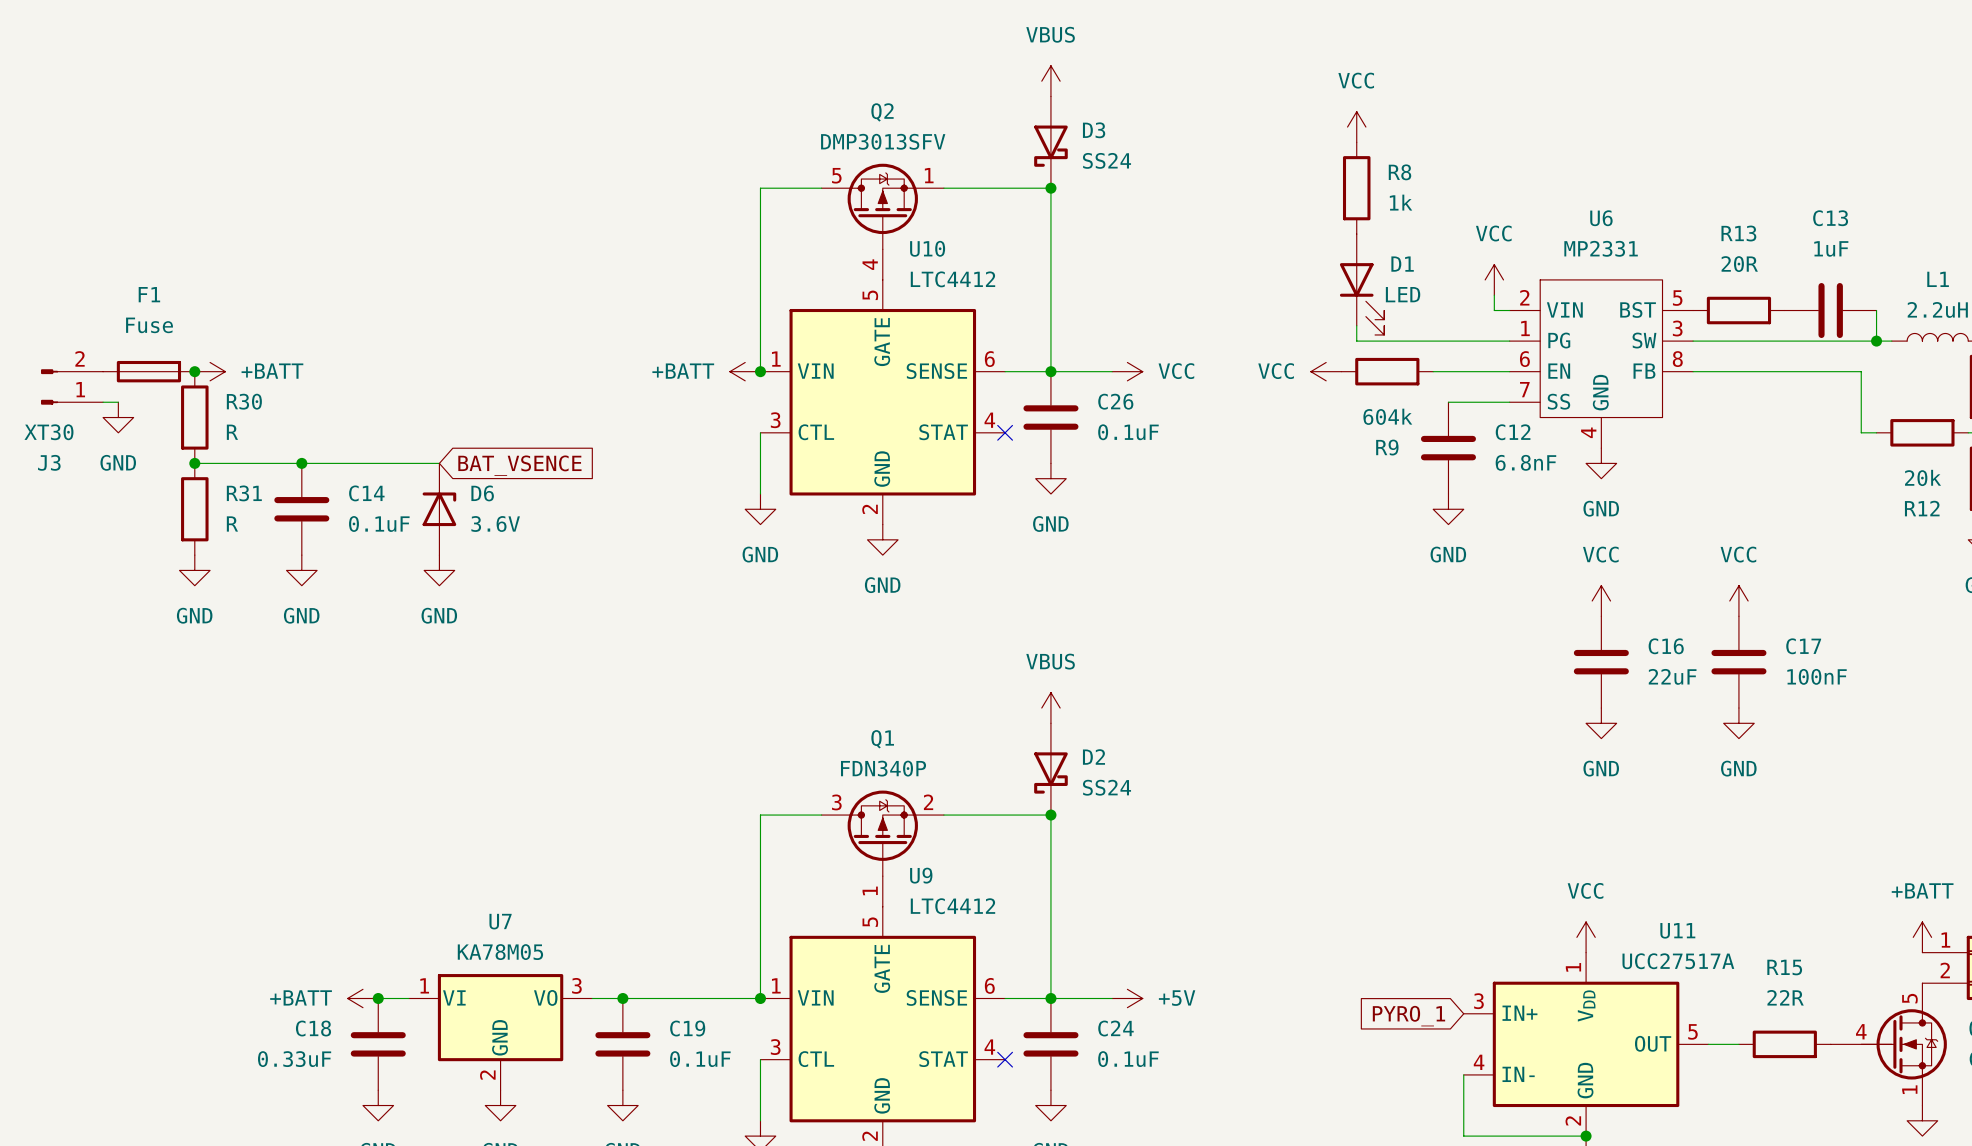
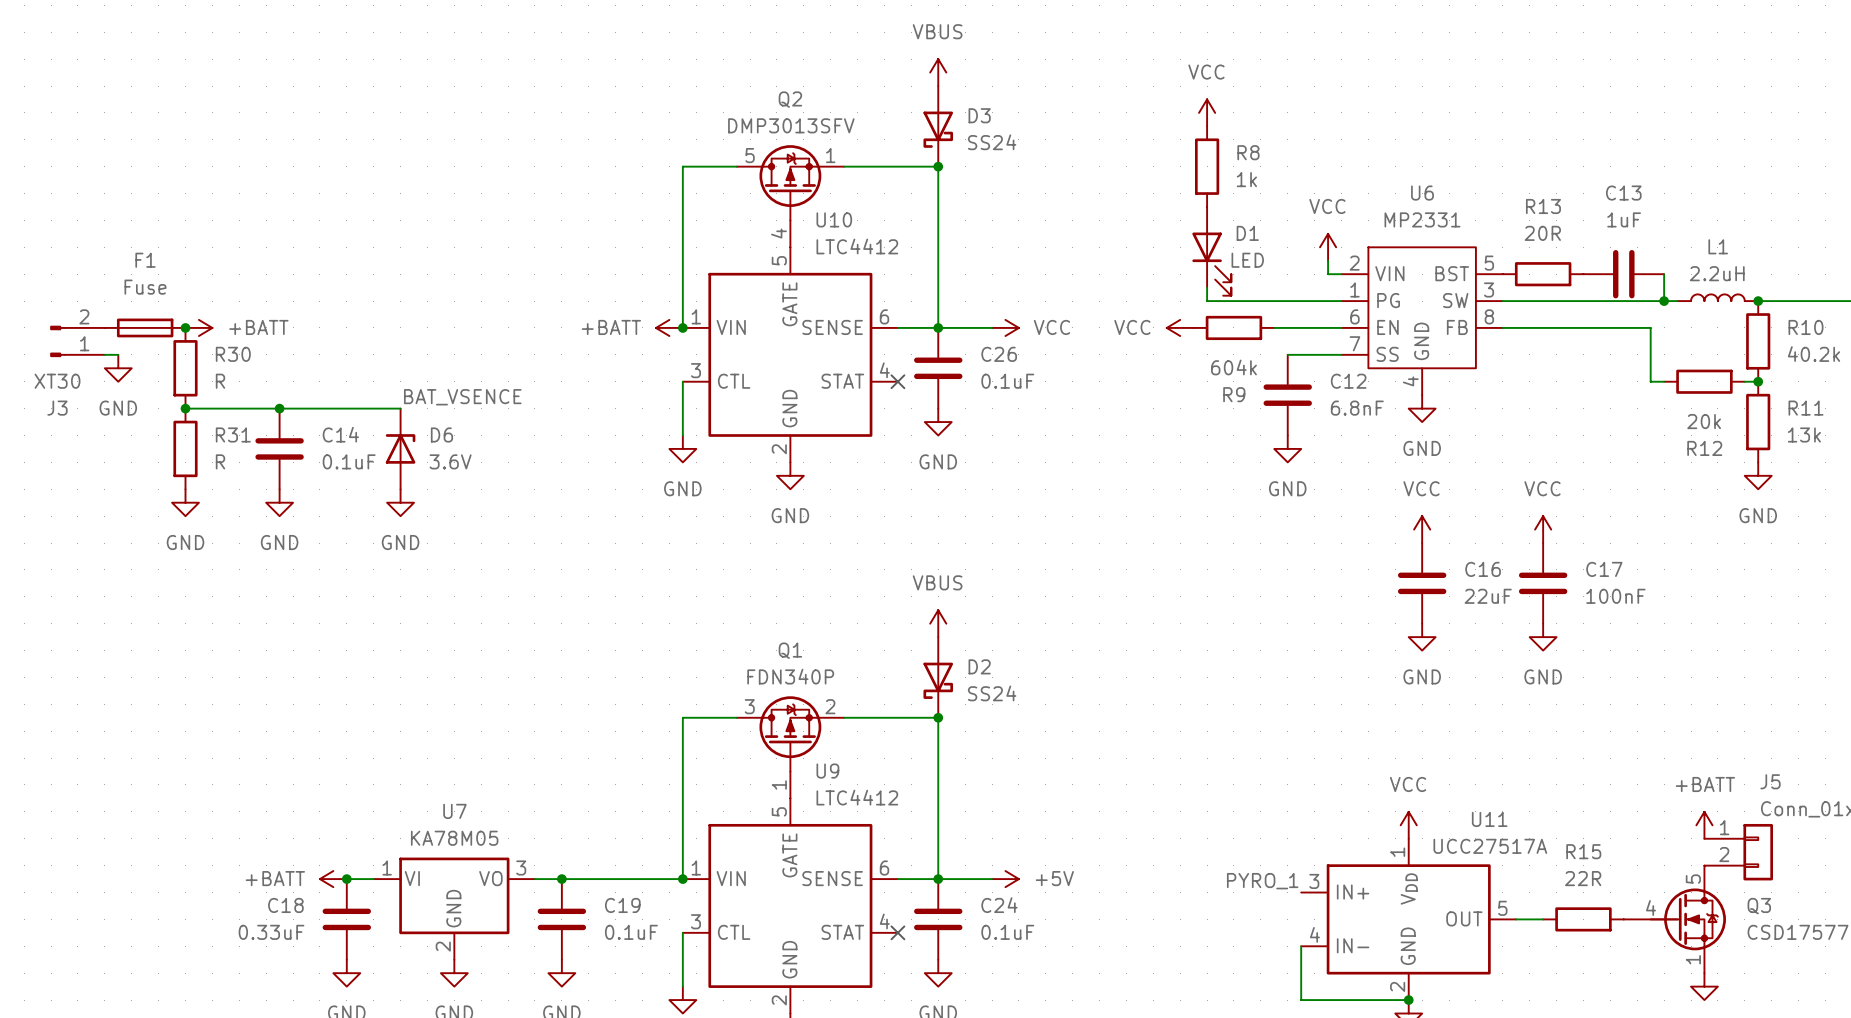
label: none -> BAT_VSENCE (462, 397)
global label: BAT_VSENCE (519, 465) -> none
label: none -> PYRO_1 (1262, 881)
global label: PYRO_1 (1408, 1016) -> none

